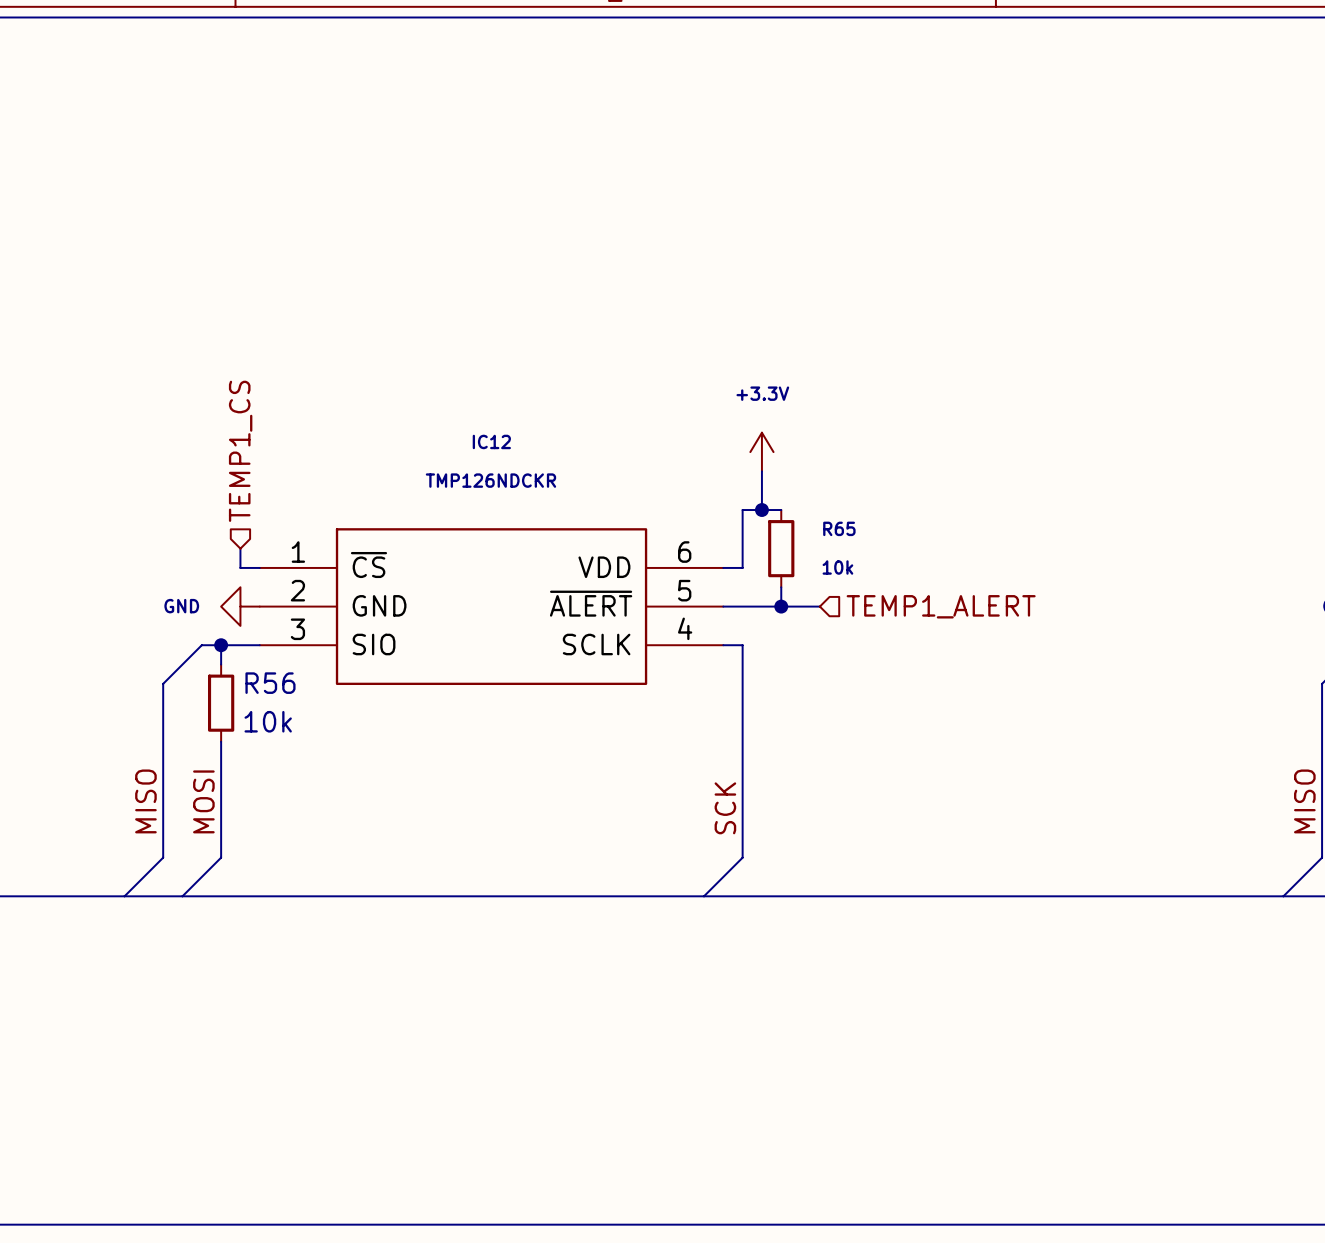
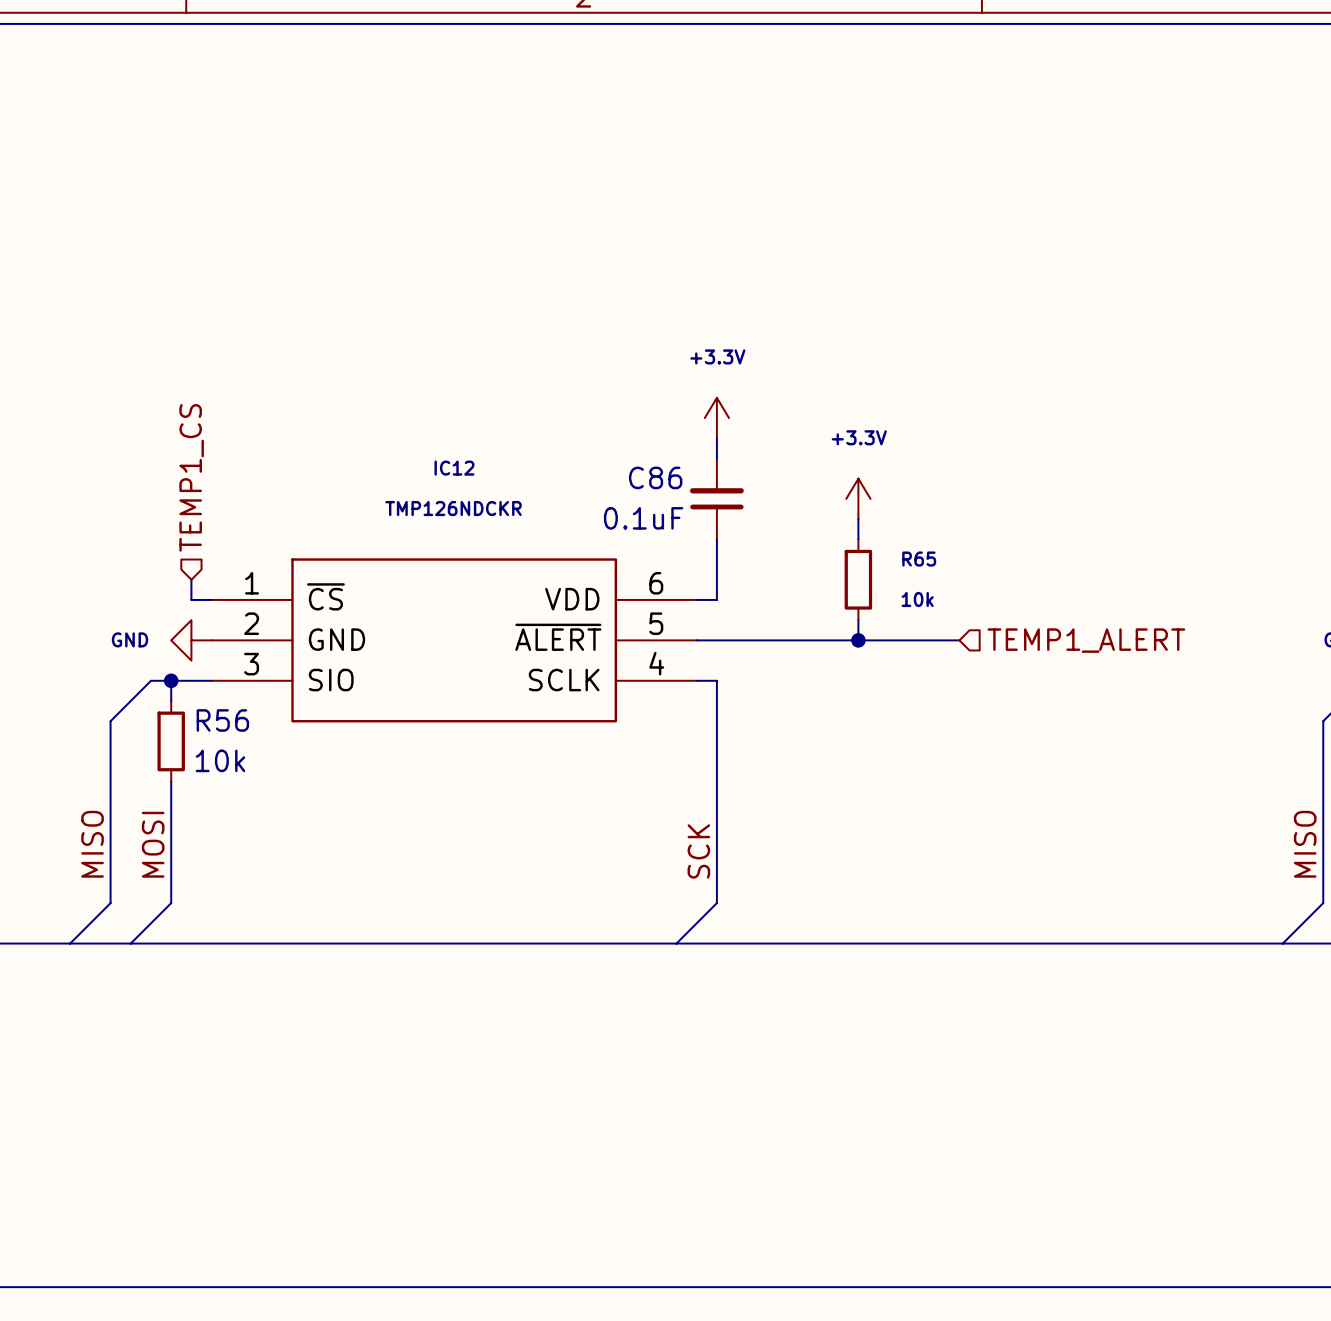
power symbol: none -> +3.3V (716, 418)
wire: none -> (716, 438) (716, 458)
power symbol: +3.3V (761, 452) -> none
C86: none -> 0.1uF (716, 498)
wire: (761, 471) (761, 510) -> none
power symbol: none -> +3.3V (858, 498)
wire: none -> (858, 519) (858, 539)
wire: (742, 510) (781, 510) -> none
junction: (761, 510) -> none
R65 position: (781, 548) -> (858, 579)
wire: (781, 587) (781, 606) -> (858, 620) (858, 640)
junction: (781, 606) -> none
wire: none -> (797, 640) (959, 640)
junction: none -> (858, 640)
hierarchical label position: TEMP1_ALERT (941, 606) -> TEMP1_ALERT (1086, 640)

